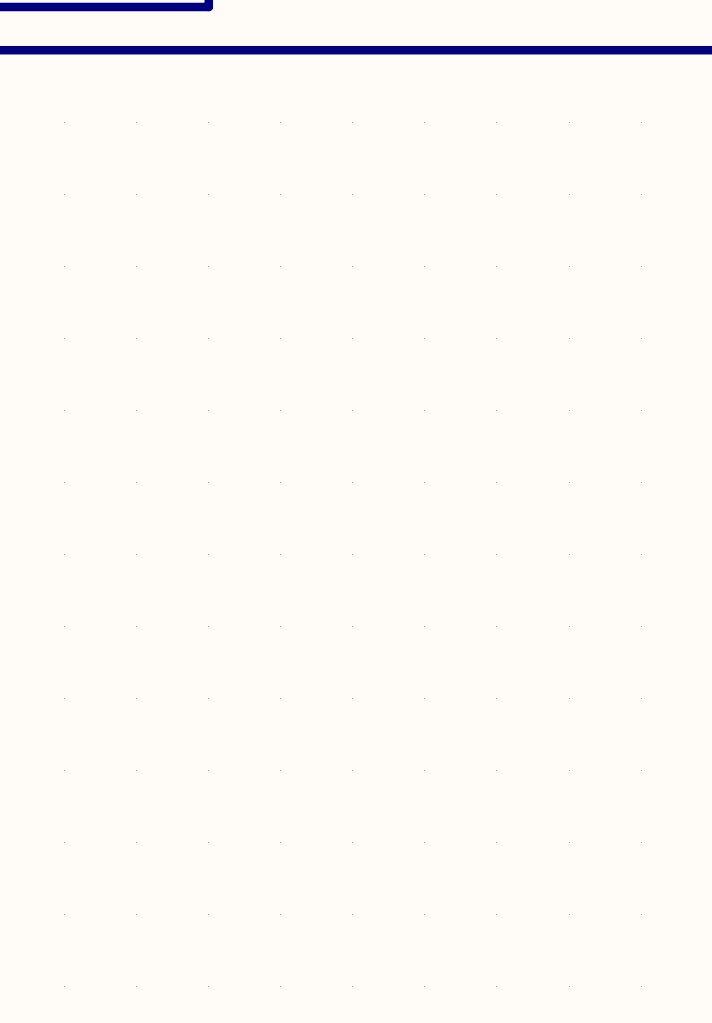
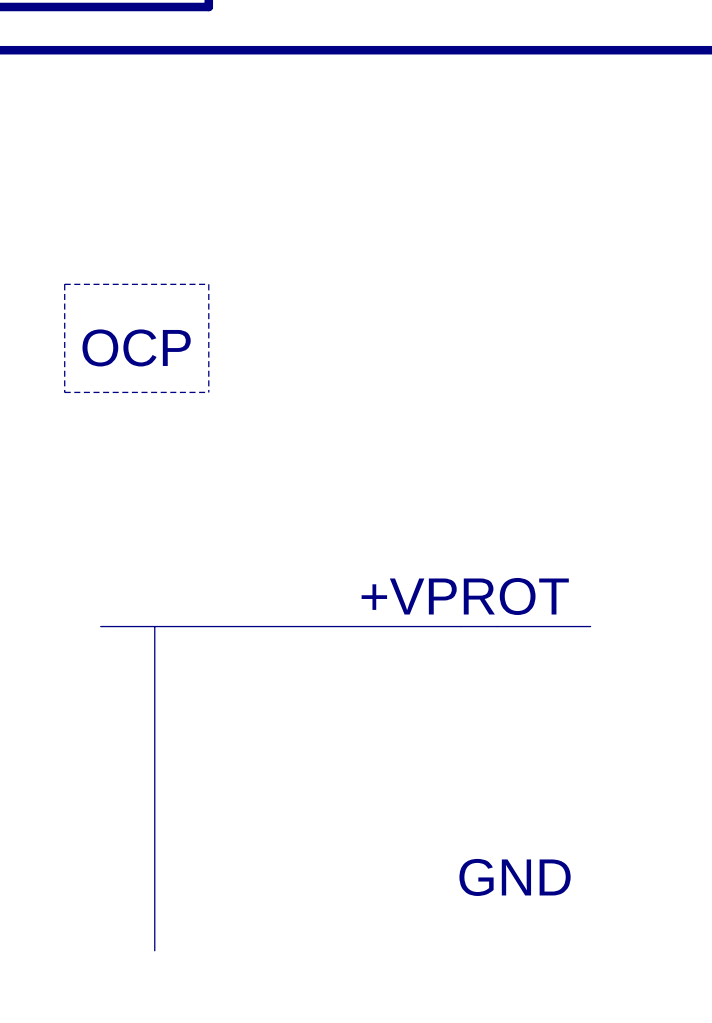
line: none -> (64, 284) (208, 284) (208, 392) (64, 392) (64, 284)
text: none -> OCP (136, 347)
text: none -> +VPROT (465, 596)
line: none -> (100, 626) (590, 626)
line: none -> (154, 626) (154, 950)
text: none -> GND (515, 877)

